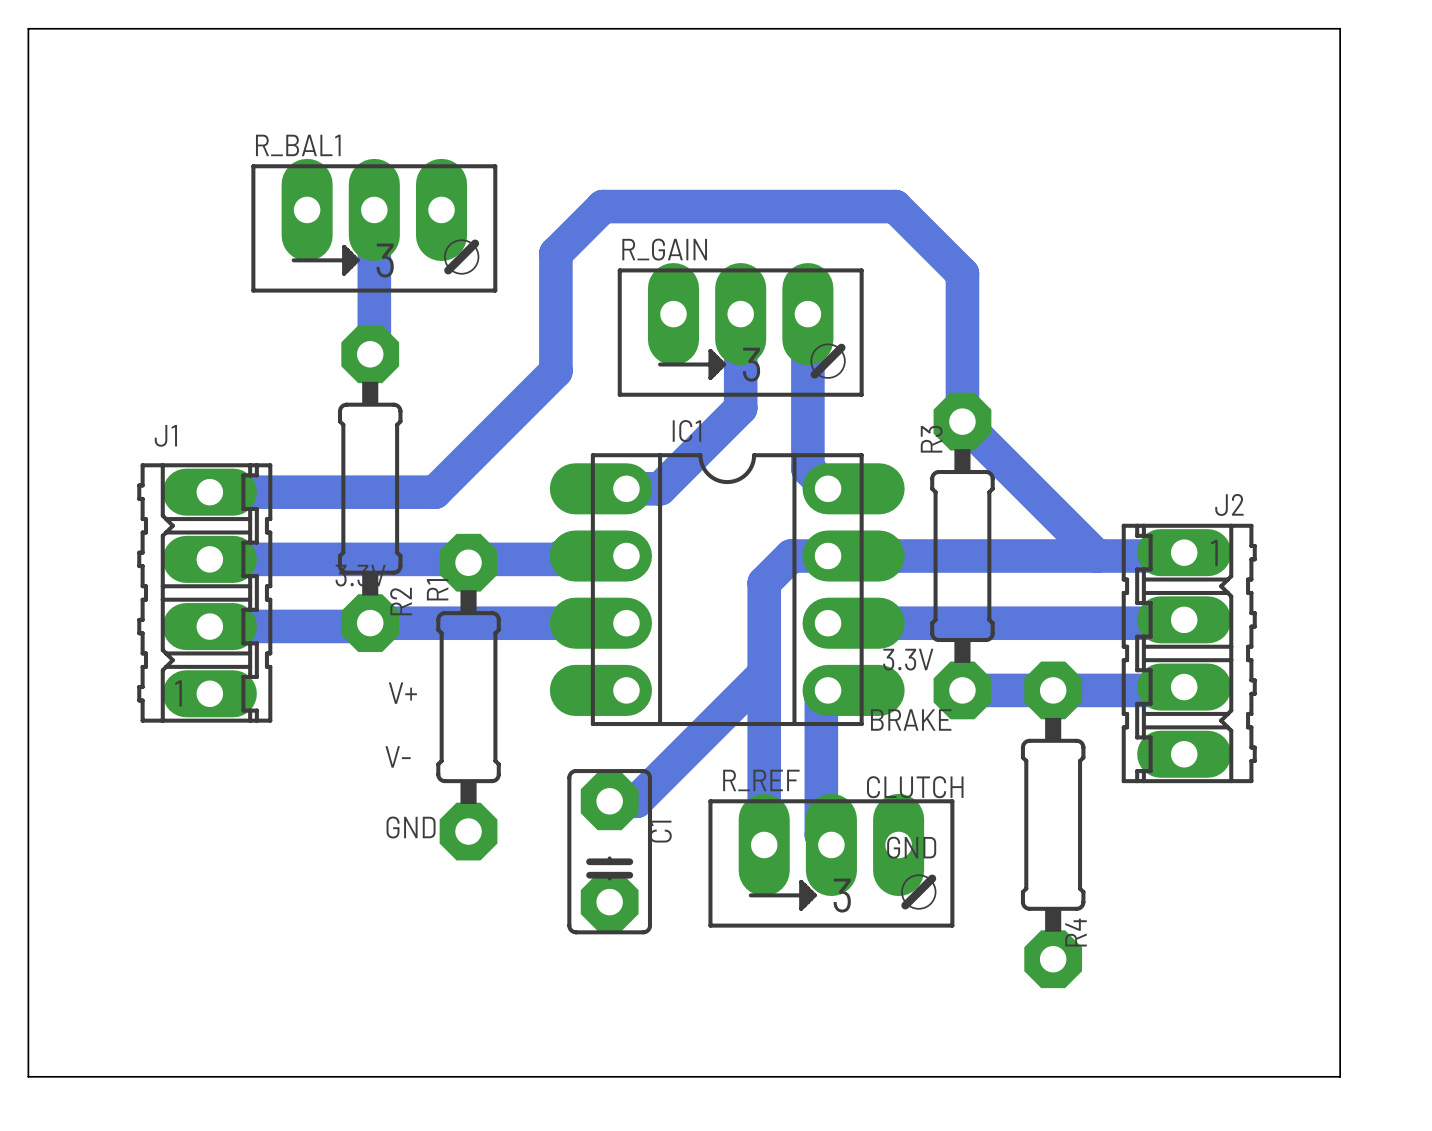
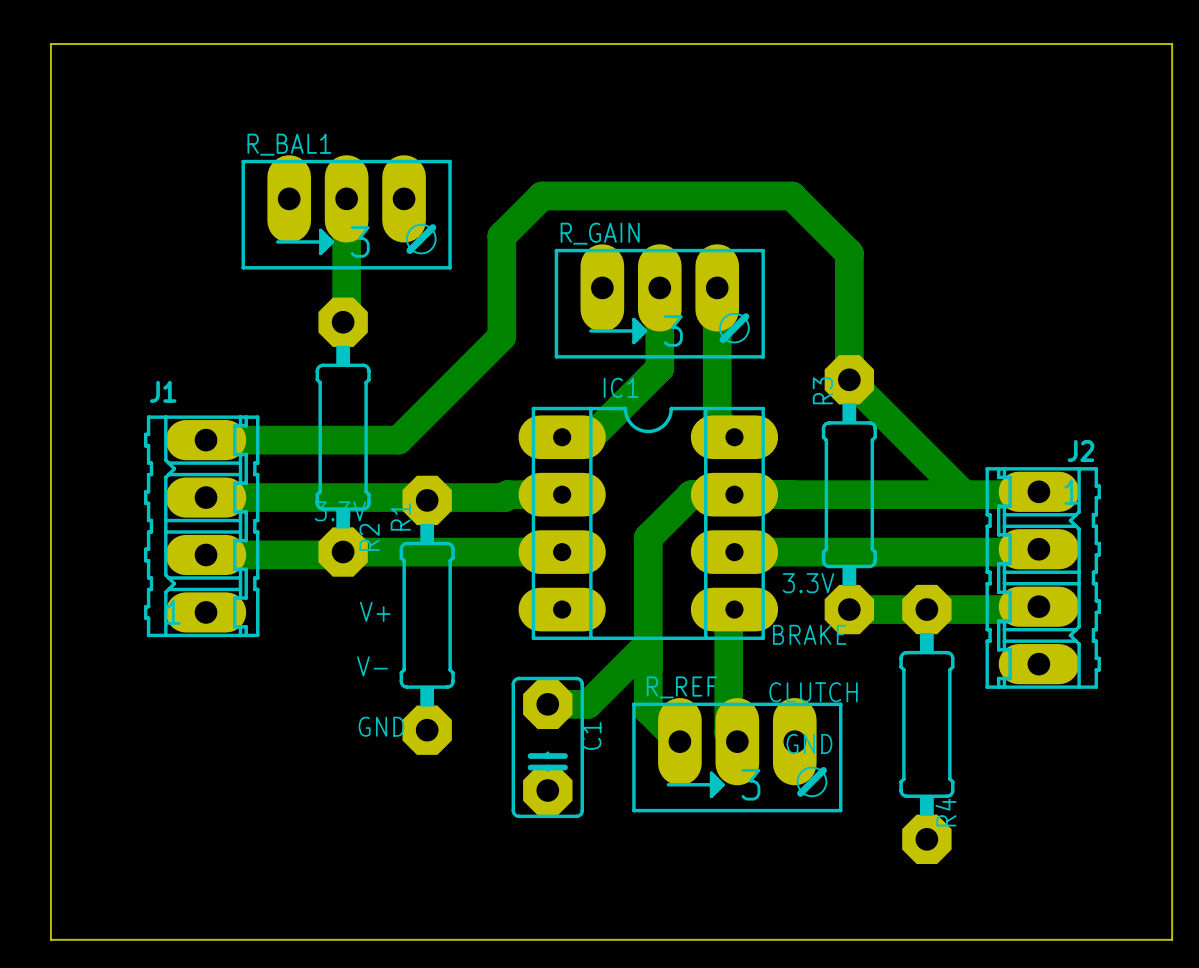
IC1 footprint: [549, 453, 905, 727] -> [518, 406, 779, 641]
bottom track: (791, 556) (764, 582) (764, 844) -> (702, 494) (691, 494) (648, 537) (648, 710) (679, 741)
bottom track: (764, 673) (636, 801) -> (648, 644) (587, 704) (570, 704)

